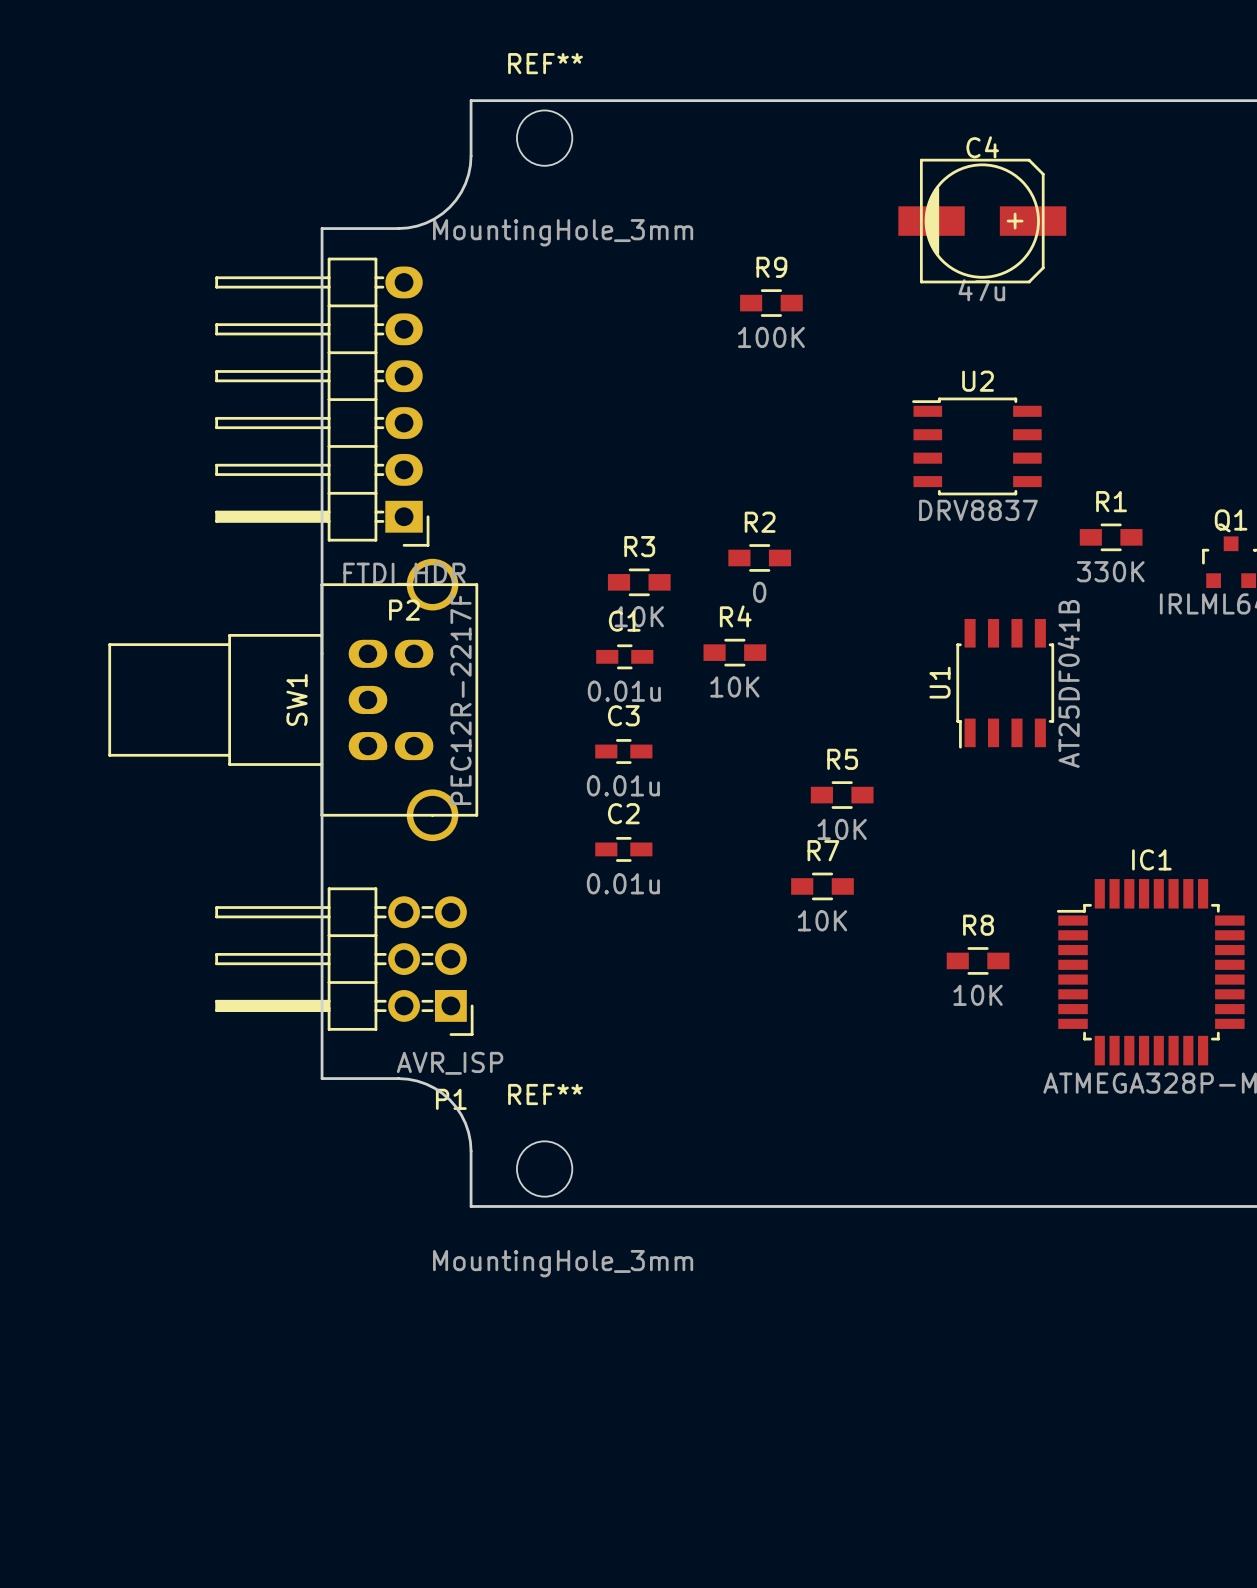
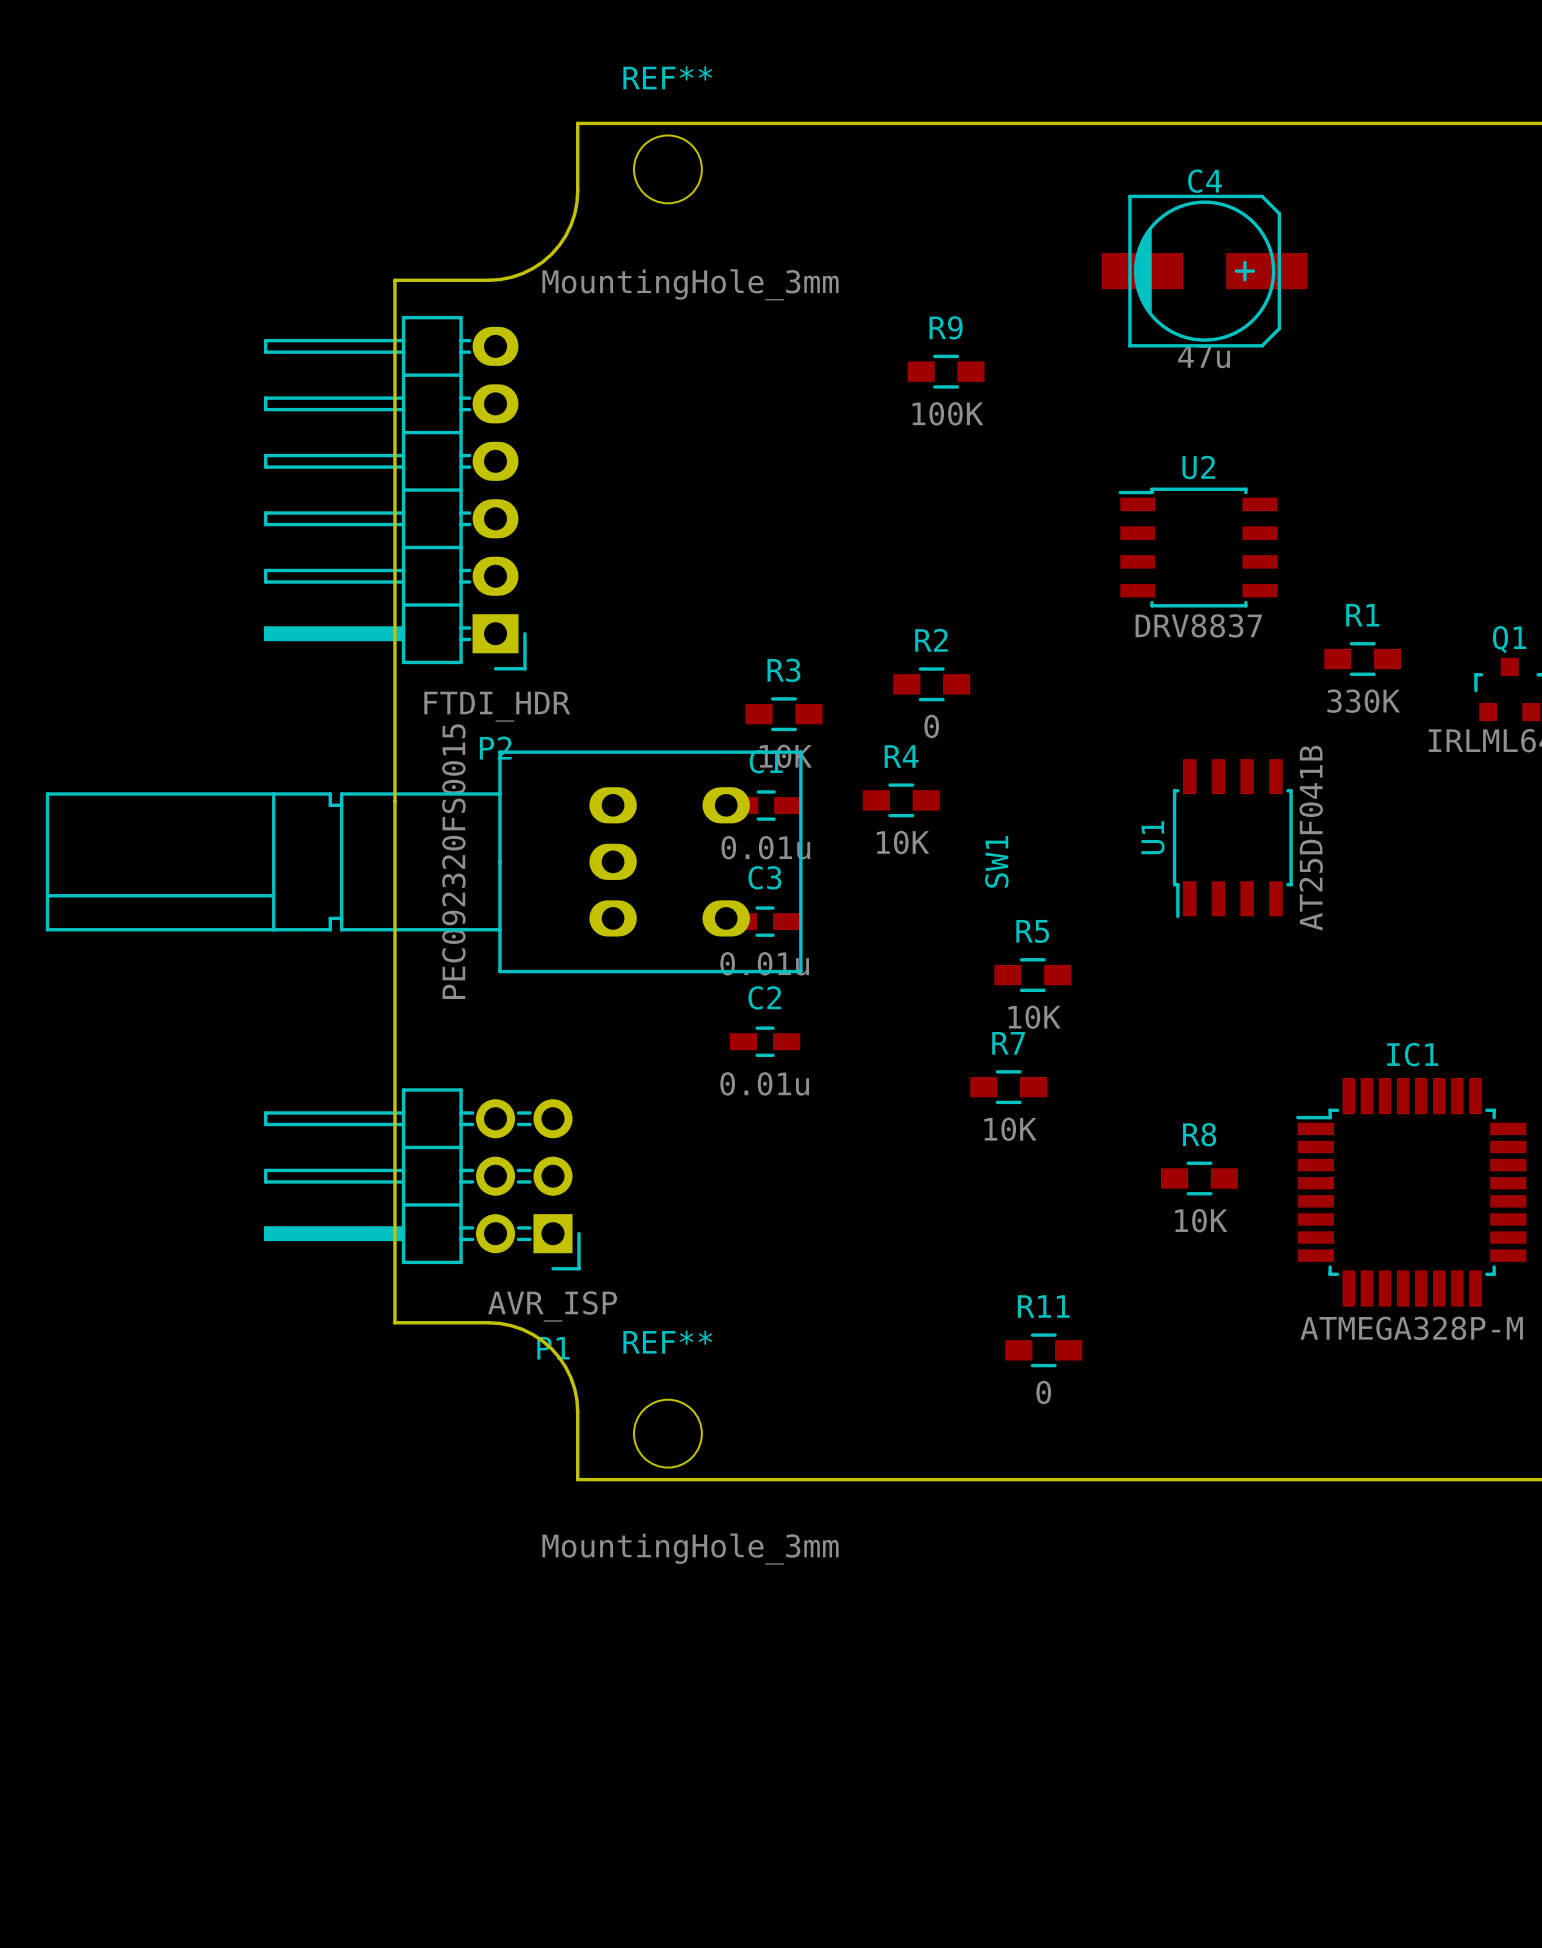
SW1 footprint: [108, 558, 479, 842] -> [45, 750, 803, 974]
SW1 name position: SW1 (297, 699) -> SW1 (996, 861)
SW1 value: PEC12R-2217F (461, 699) -> PEC092320FS0015 (453, 861)
R11: none -> 0 (1043, 1350)

